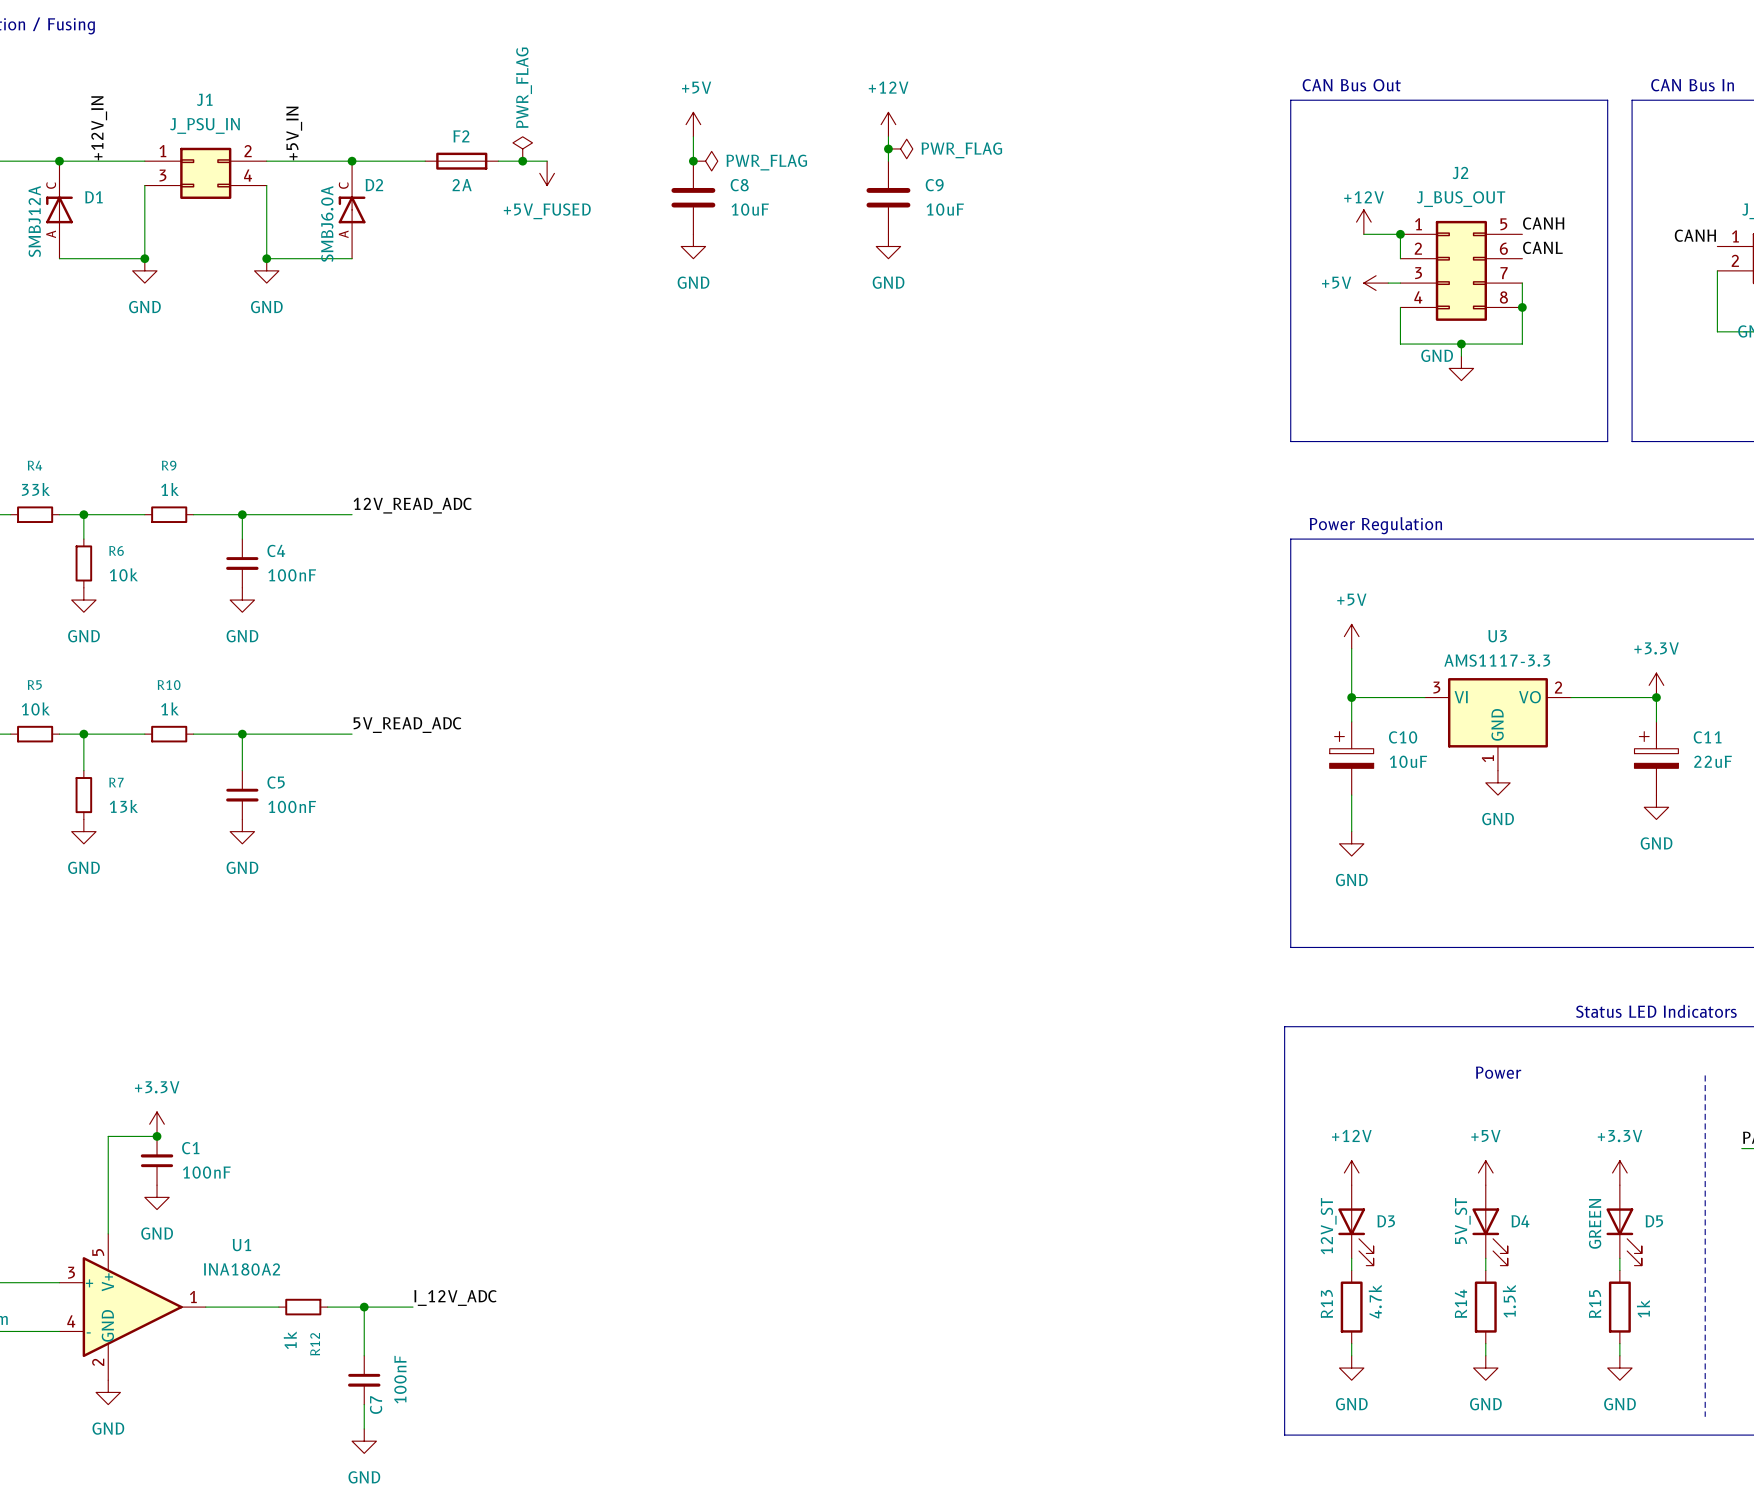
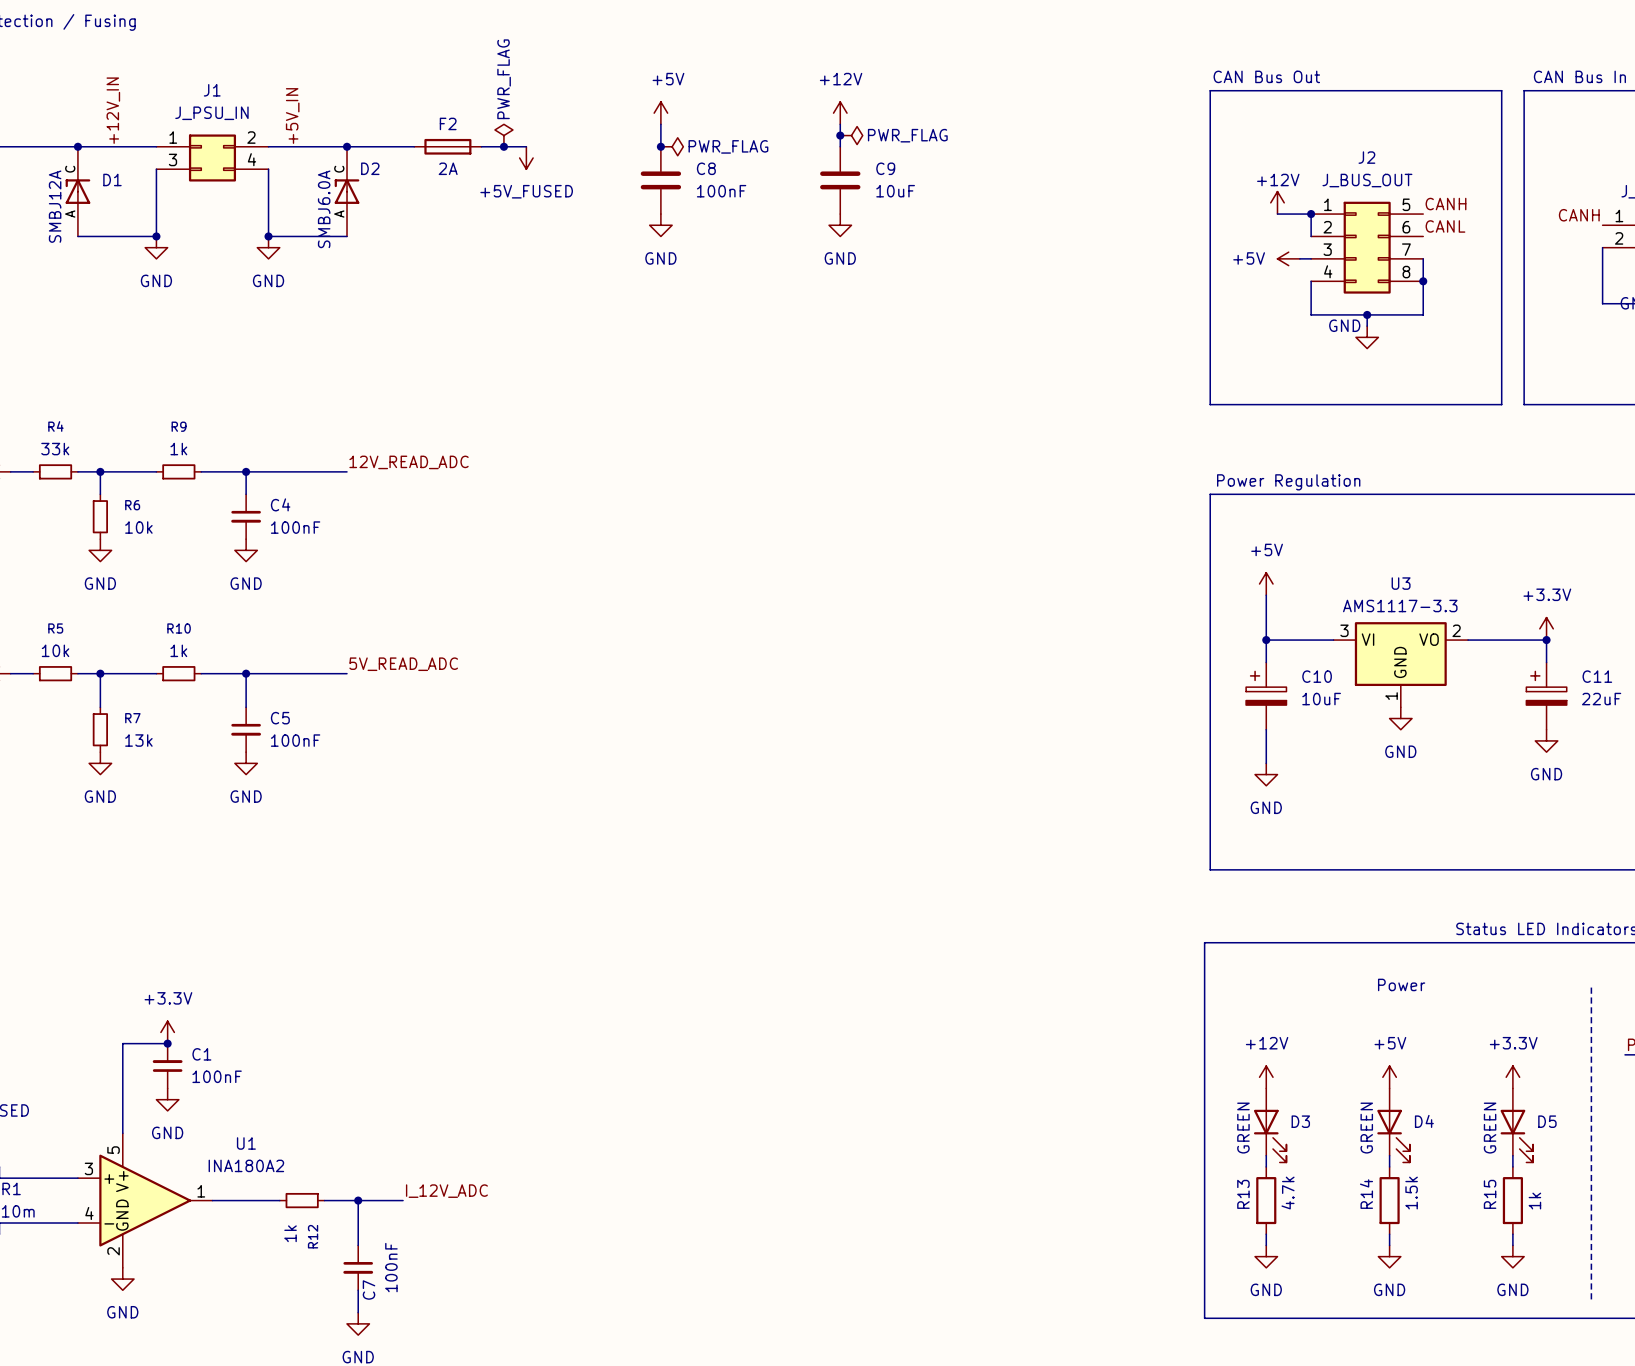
C8 value: 10uF (750, 209) -> 100nF (721, 191)
D4 value: 5V_ST (1462, 1220) -> GREEN (1366, 1128)
D3 value: 12V_ST (1328, 1226) -> GREEN (1243, 1128)

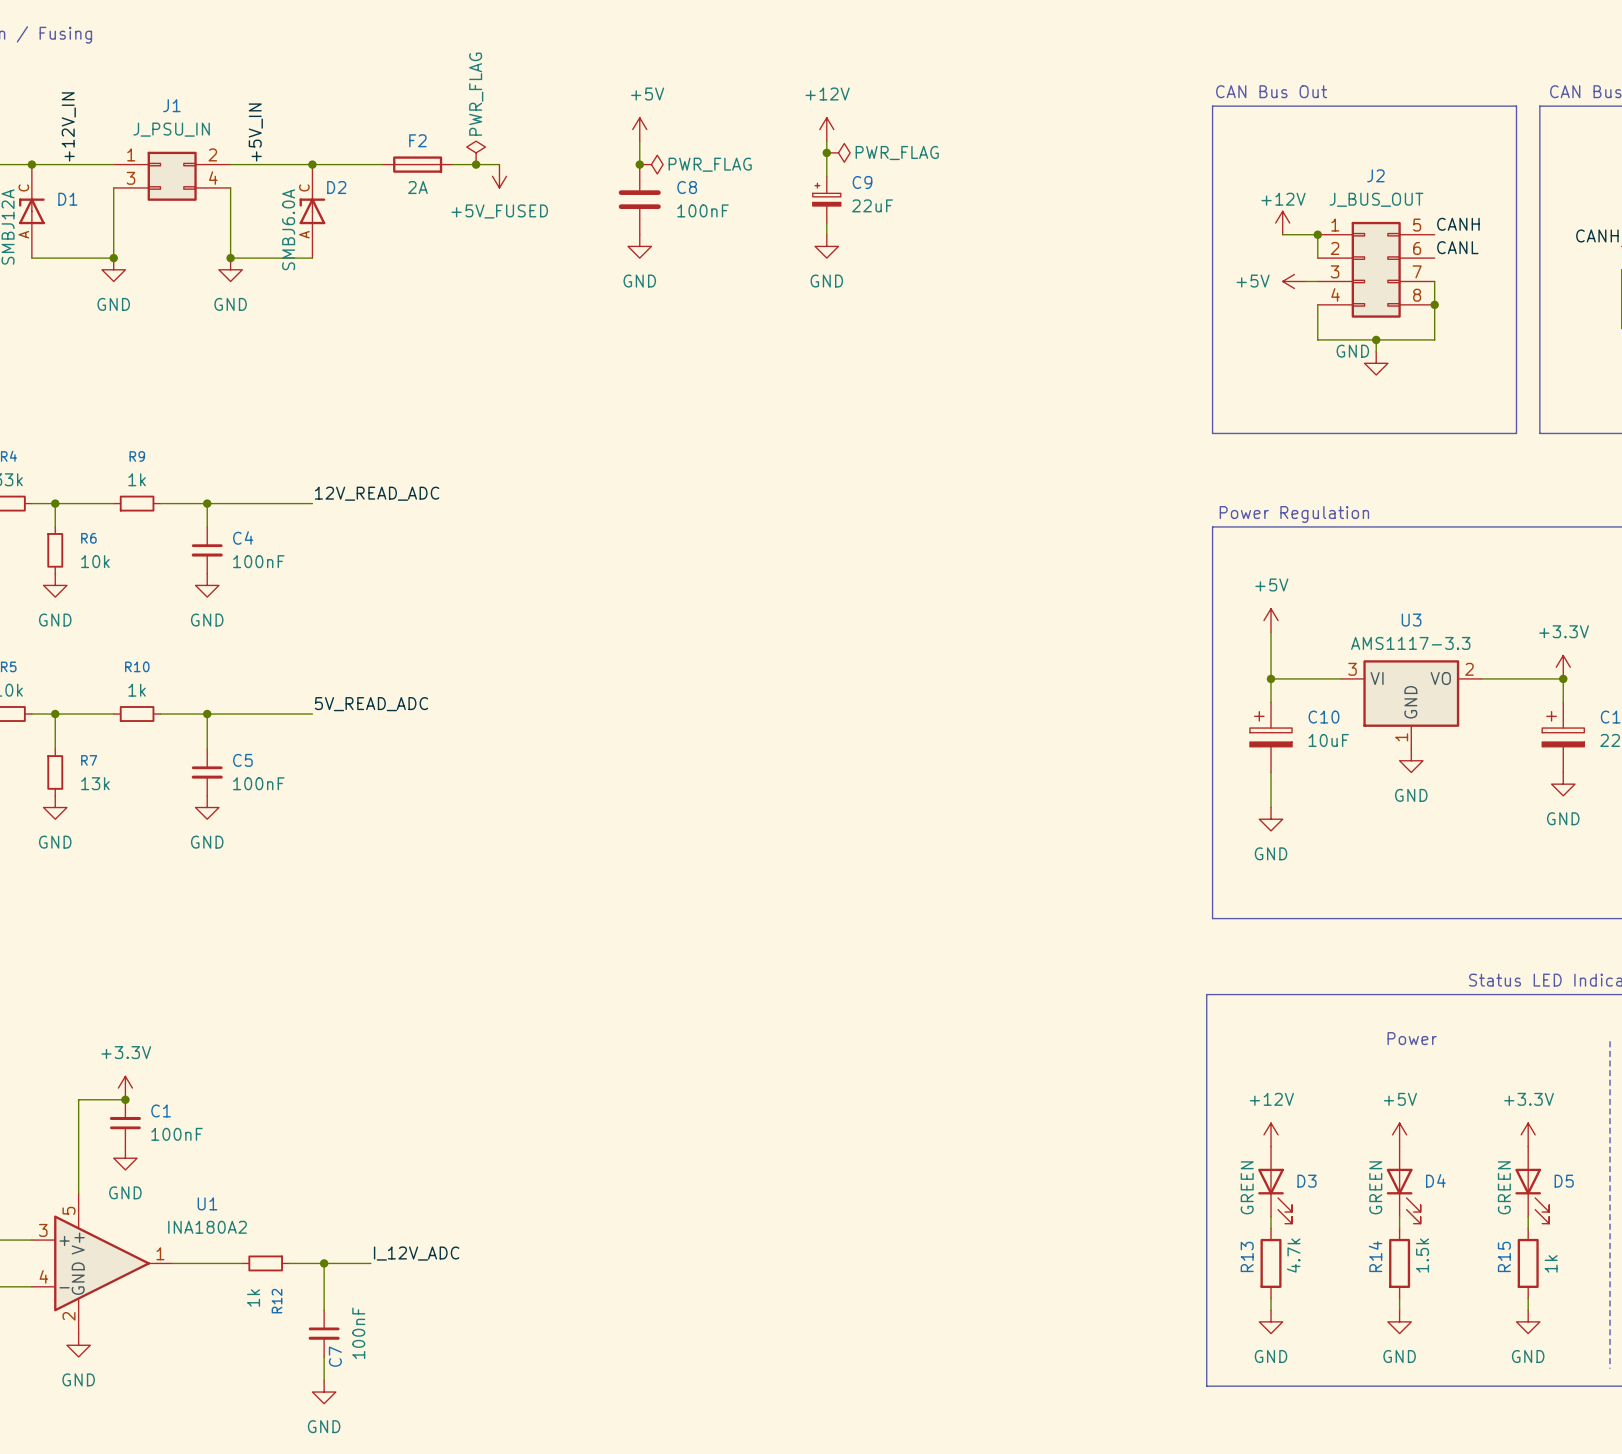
C9 symbol: [820, 146, 861, 215] -> [812, 176, 841, 224]
C9 value: 10uF (895, 191) -> 22uF (872, 205)

